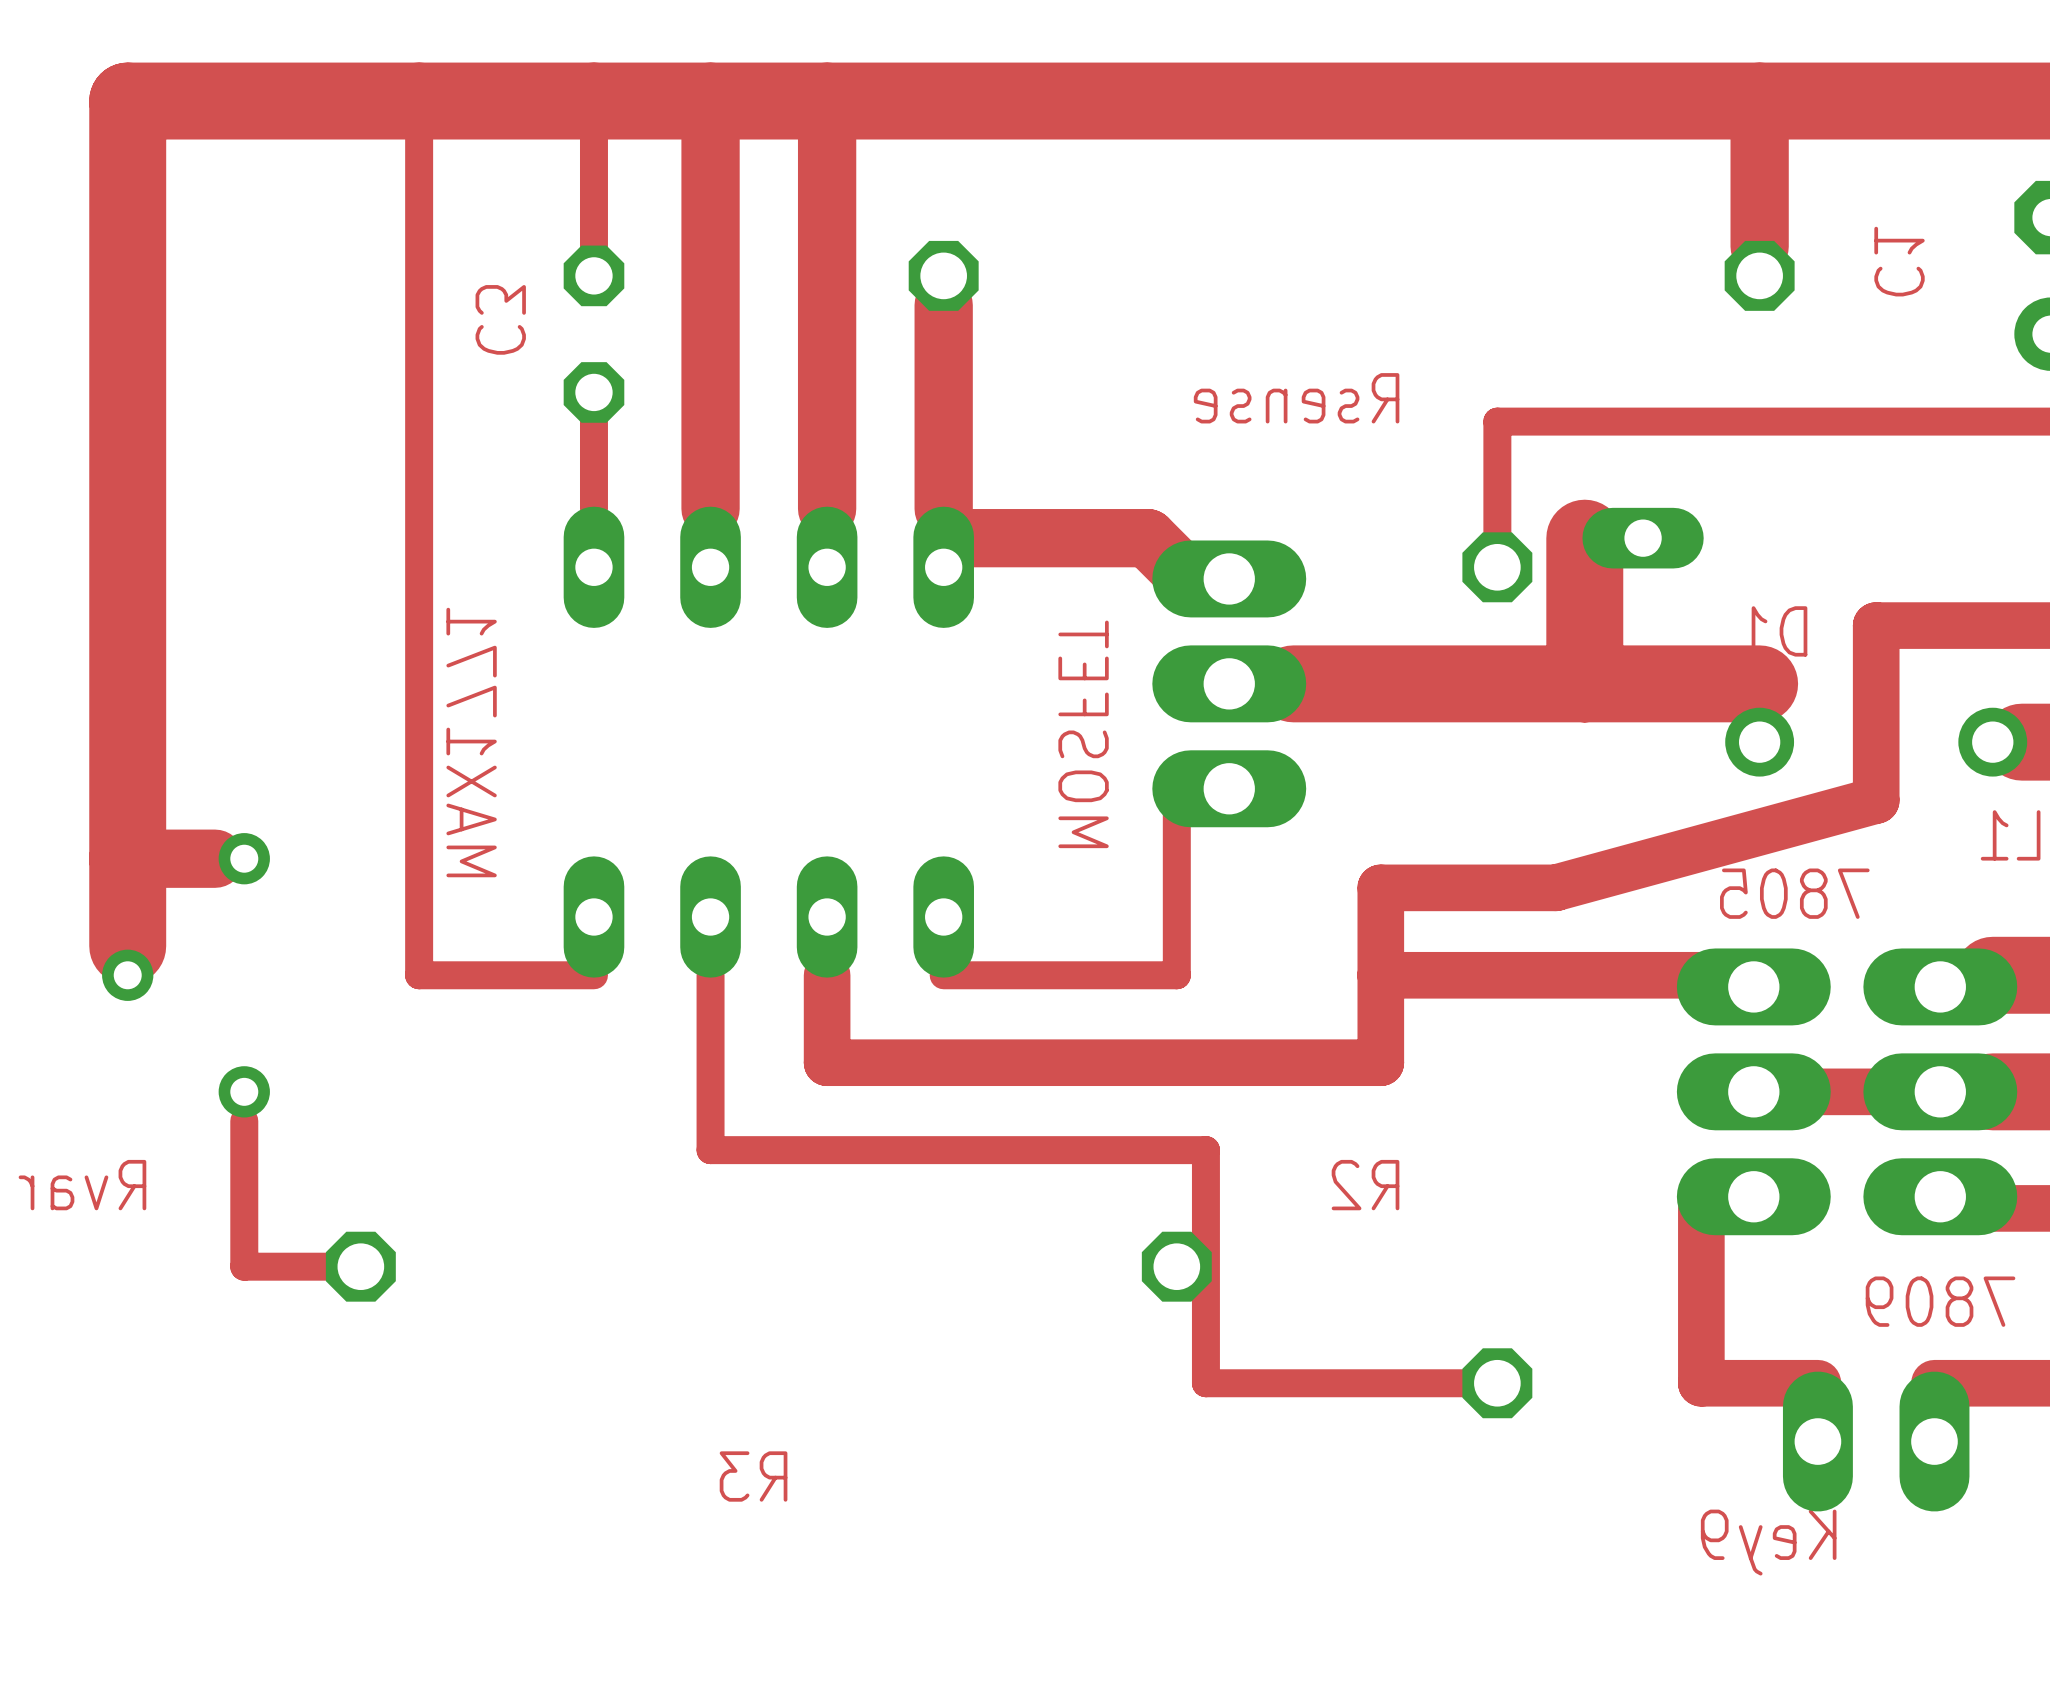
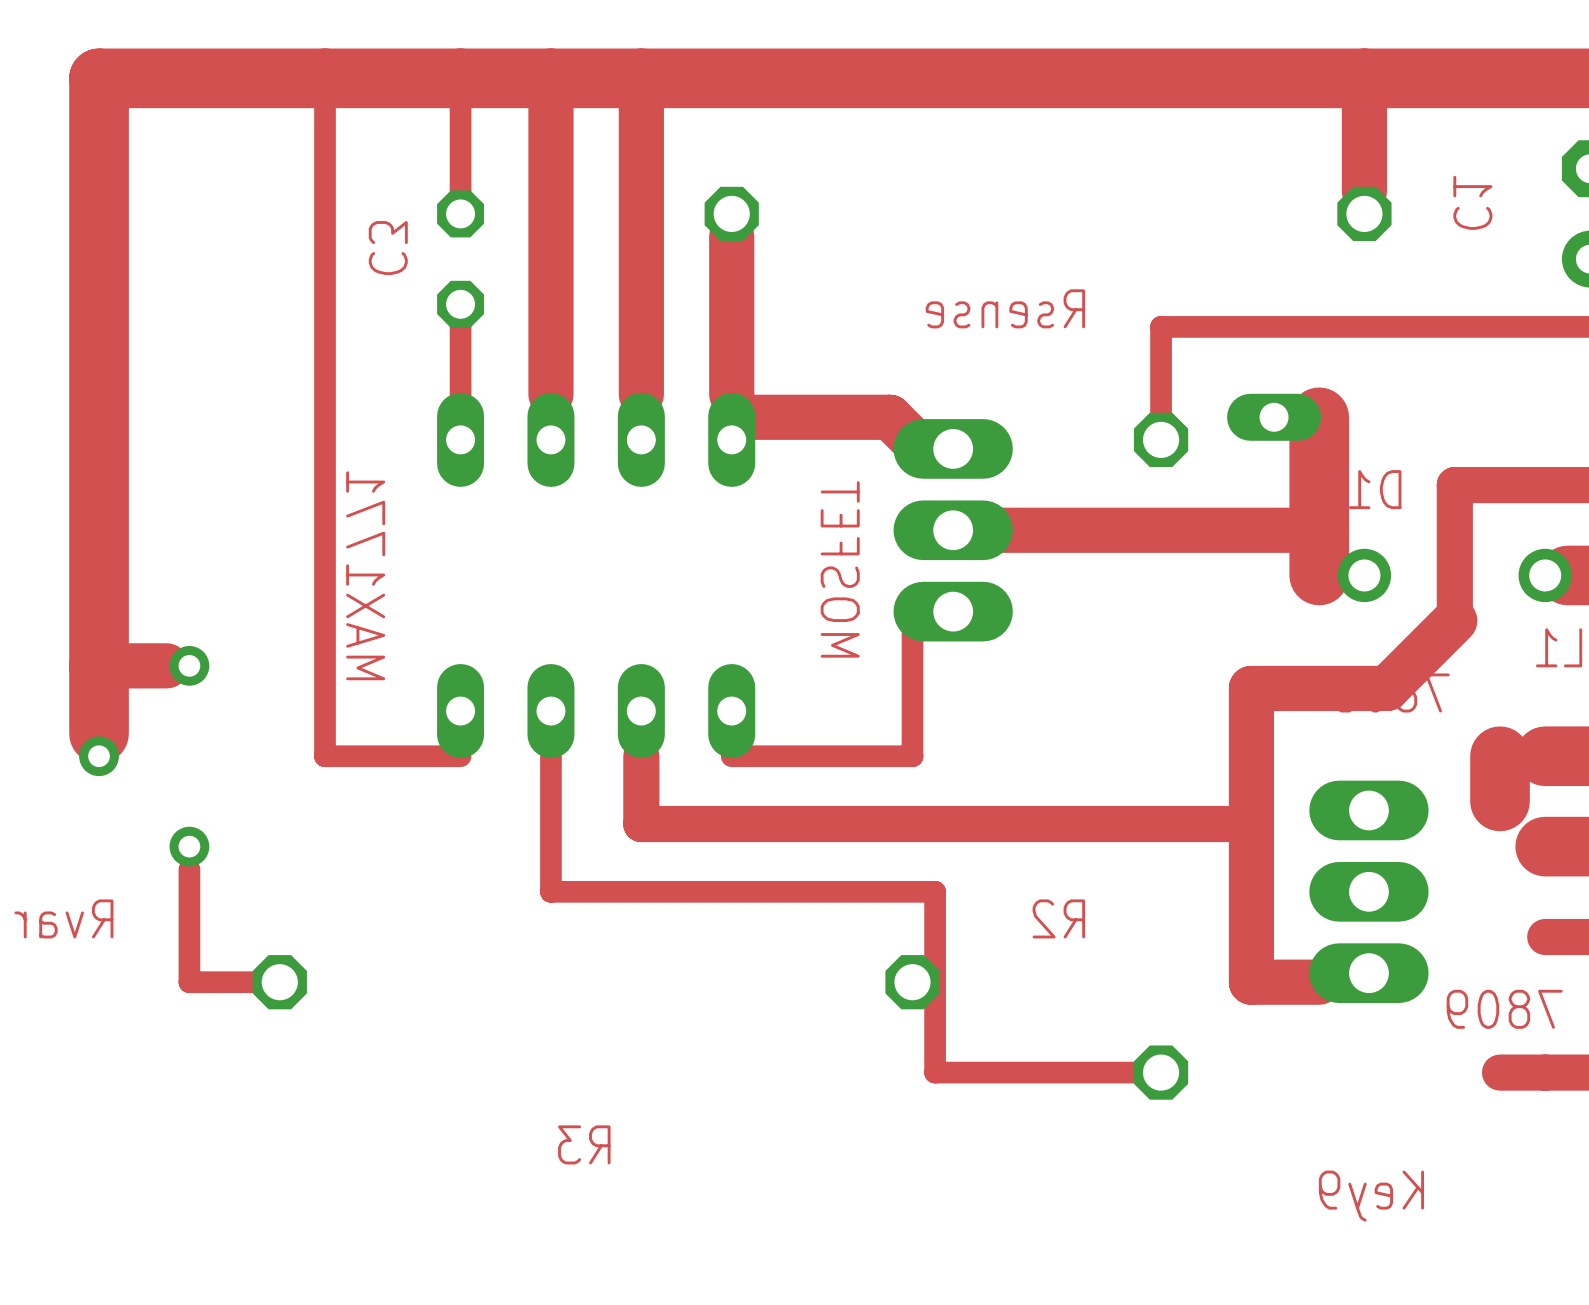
top track: (1584, 538) (1584, 683) -> none
top track: none -> (1319, 417) (1319, 575)
top track width: thick (1701, 683) (1293, 683) -> thin (1319, 530) (1002, 530)
top track: (1759, 683) (1701, 683) -> none
top track: (1876, 800) (1555, 887) (1380, 887) (1380, 1062) -> (1251, 824) (1070, 824)
top track: none -> (1454, 620) (1387, 688) (1251, 688) (1251, 982) (1319, 982)
top track: (1701, 975) (1380, 975) -> none
top track: none -> (1500, 756) (1500, 801)
part position: (1753, 1091) -> (1368, 891)
top track: (1876, 1091) (1817, 1091) -> none
part: (1940, 1091) -> none
top track: (1701, 1208) (1701, 1383) (1817, 1383) -> none
part: (1876, 1441) -> none

